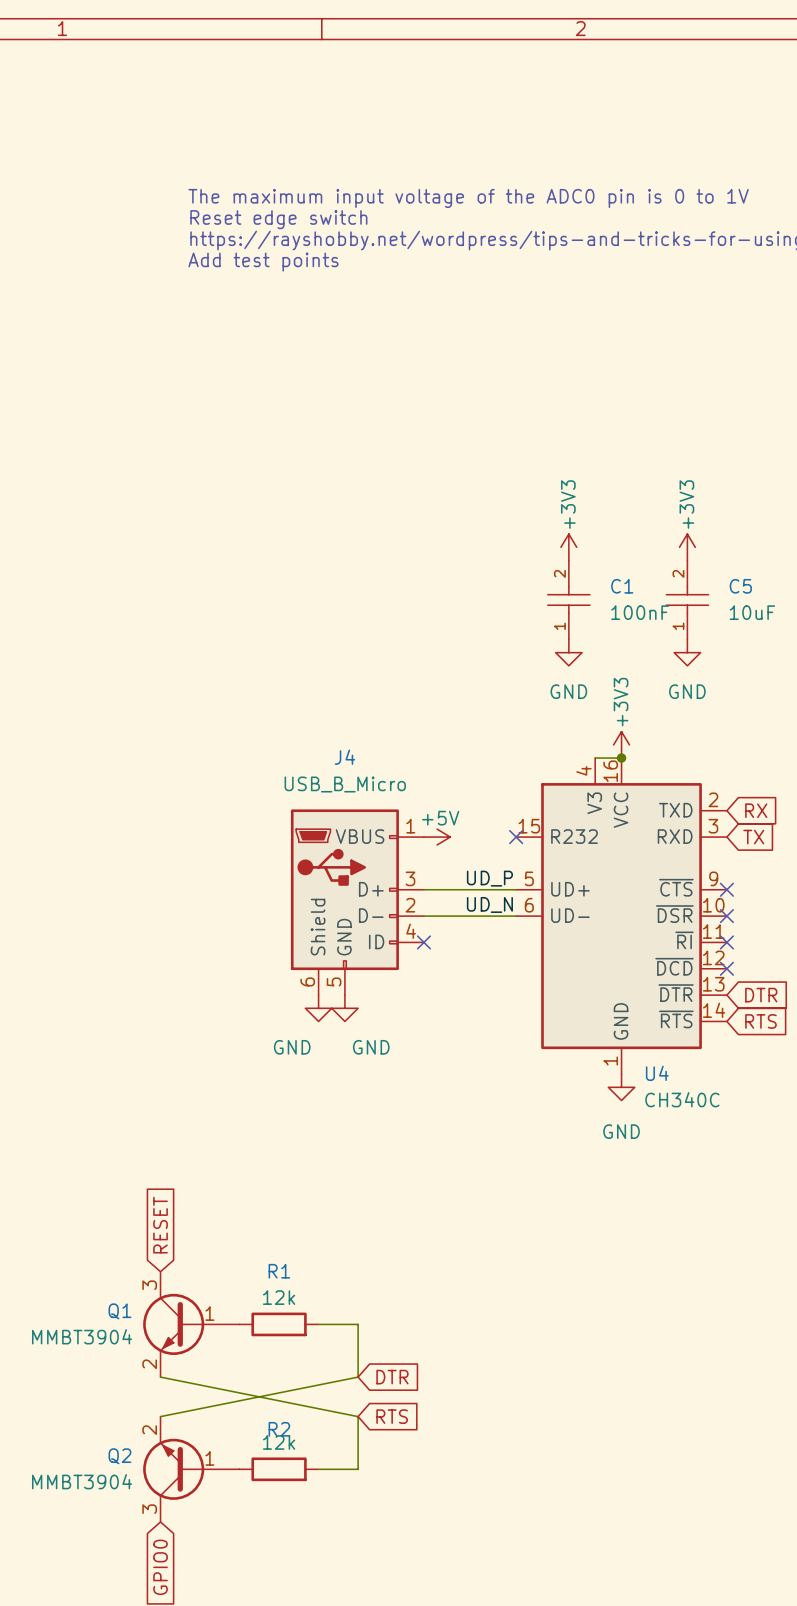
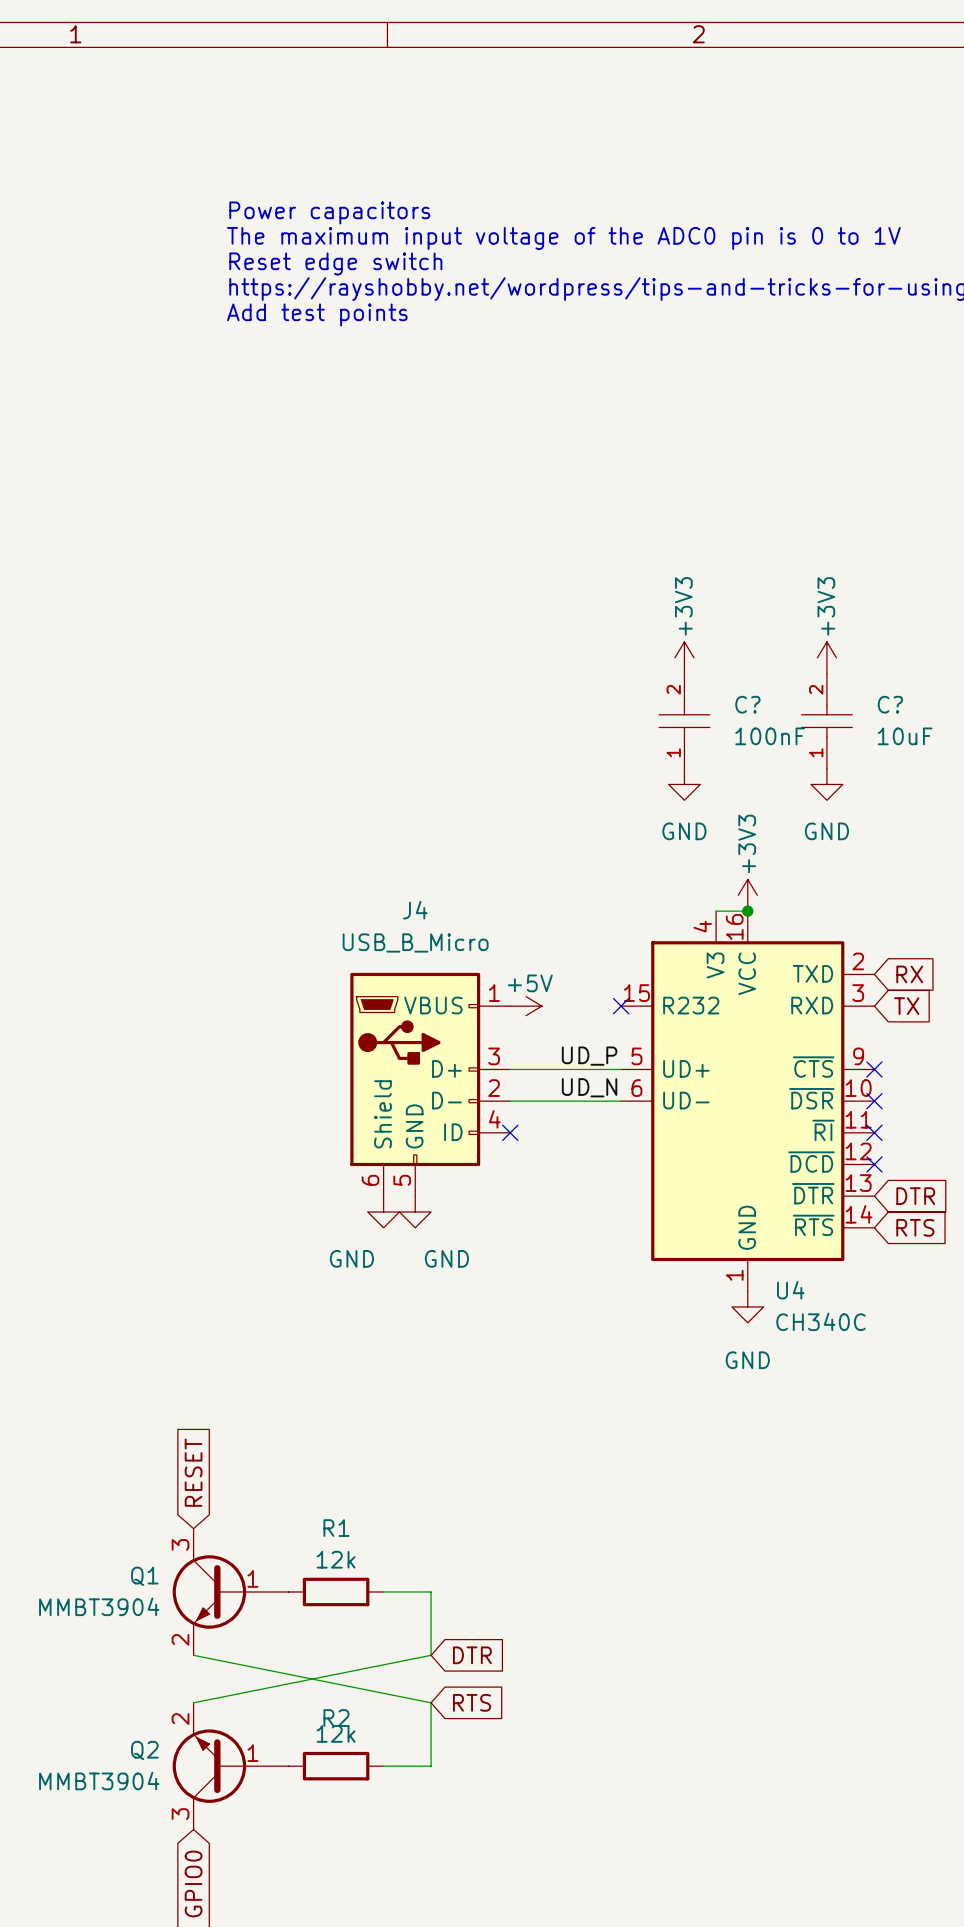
text: none -> Power capacitors (329, 212)
C1 name: C1 (622, 586) -> C? (747, 704)
C5 name: C5 (740, 586) -> C? (890, 704)

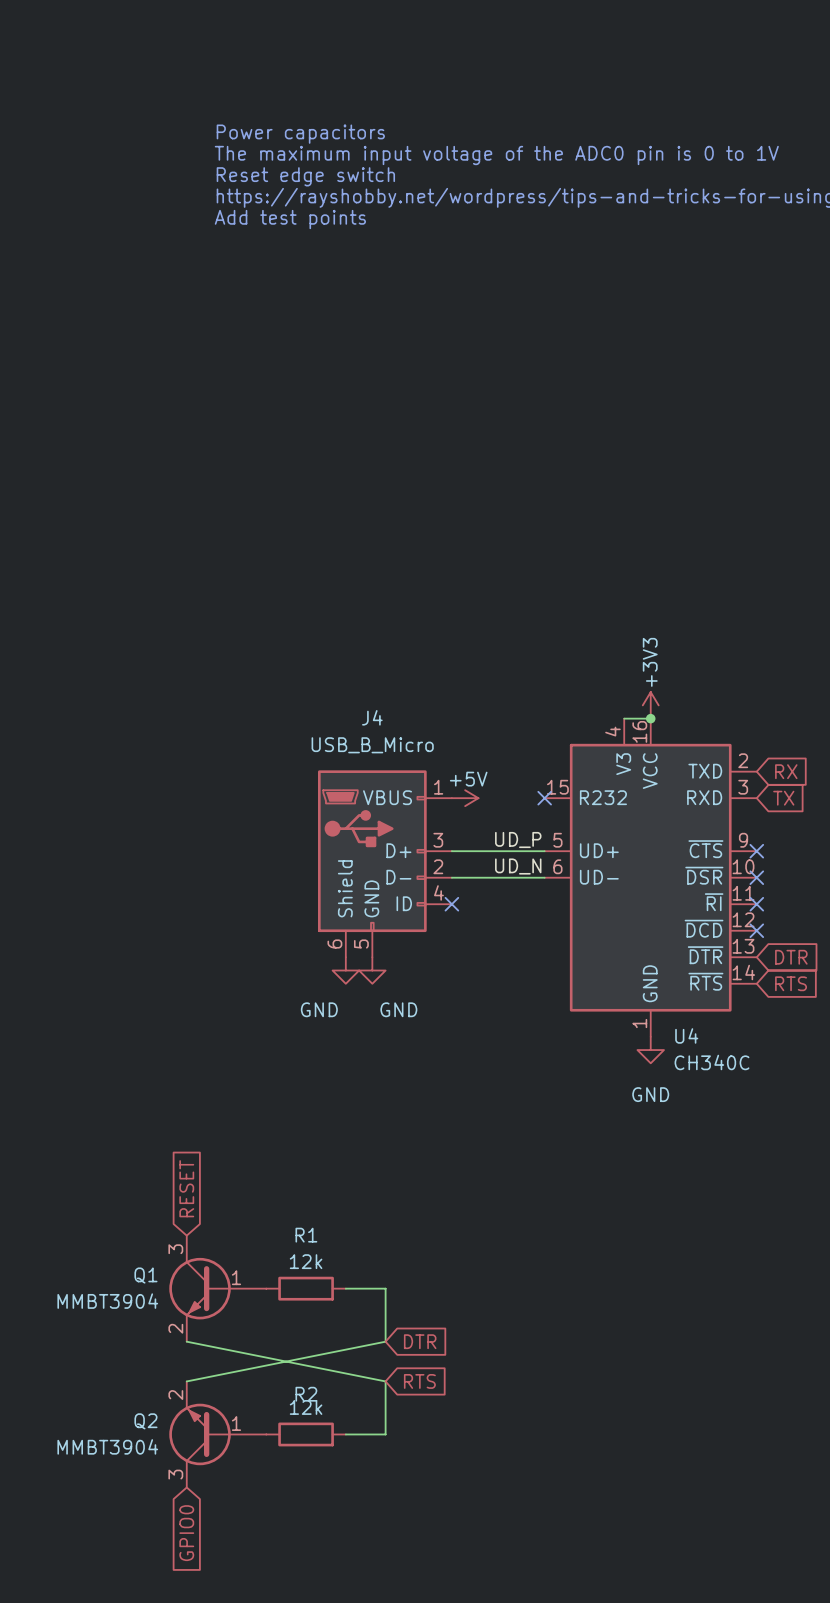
power symbol: +3V3 (684, 657) -> none
power symbol: +3V3 (826, 657) -> none
C?: 100nF (684, 721) -> none
C?: 10uF (826, 721) -> none
power symbol: GND (684, 784) -> none
power symbol: GND (826, 784) -> none

